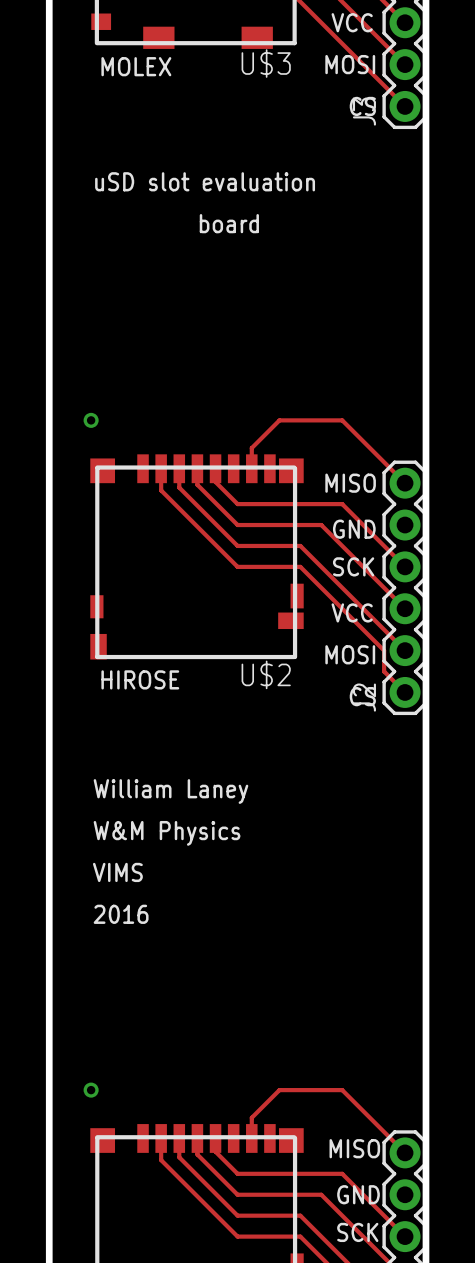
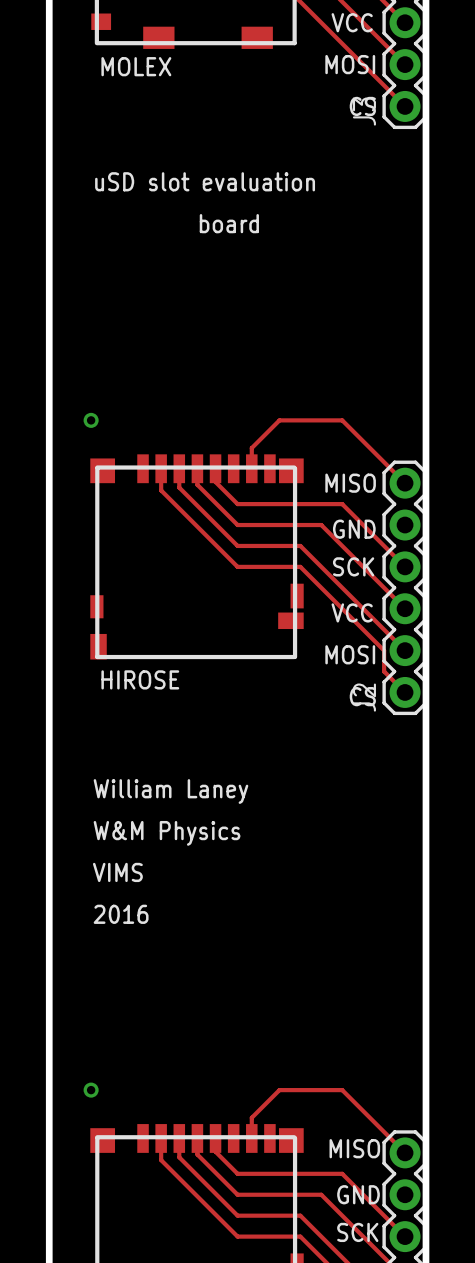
U$3 name: U$3 (266, 63) -> none
U$2 name: U$2 (266, 674) -> none

